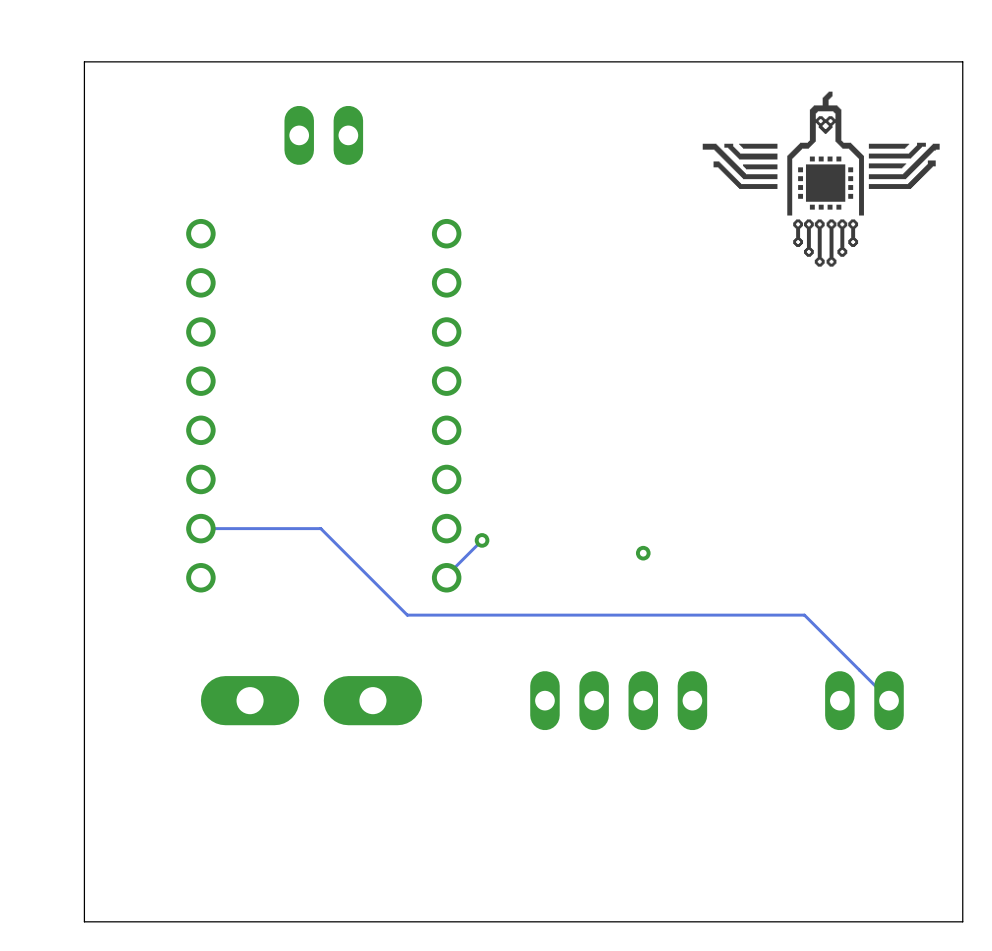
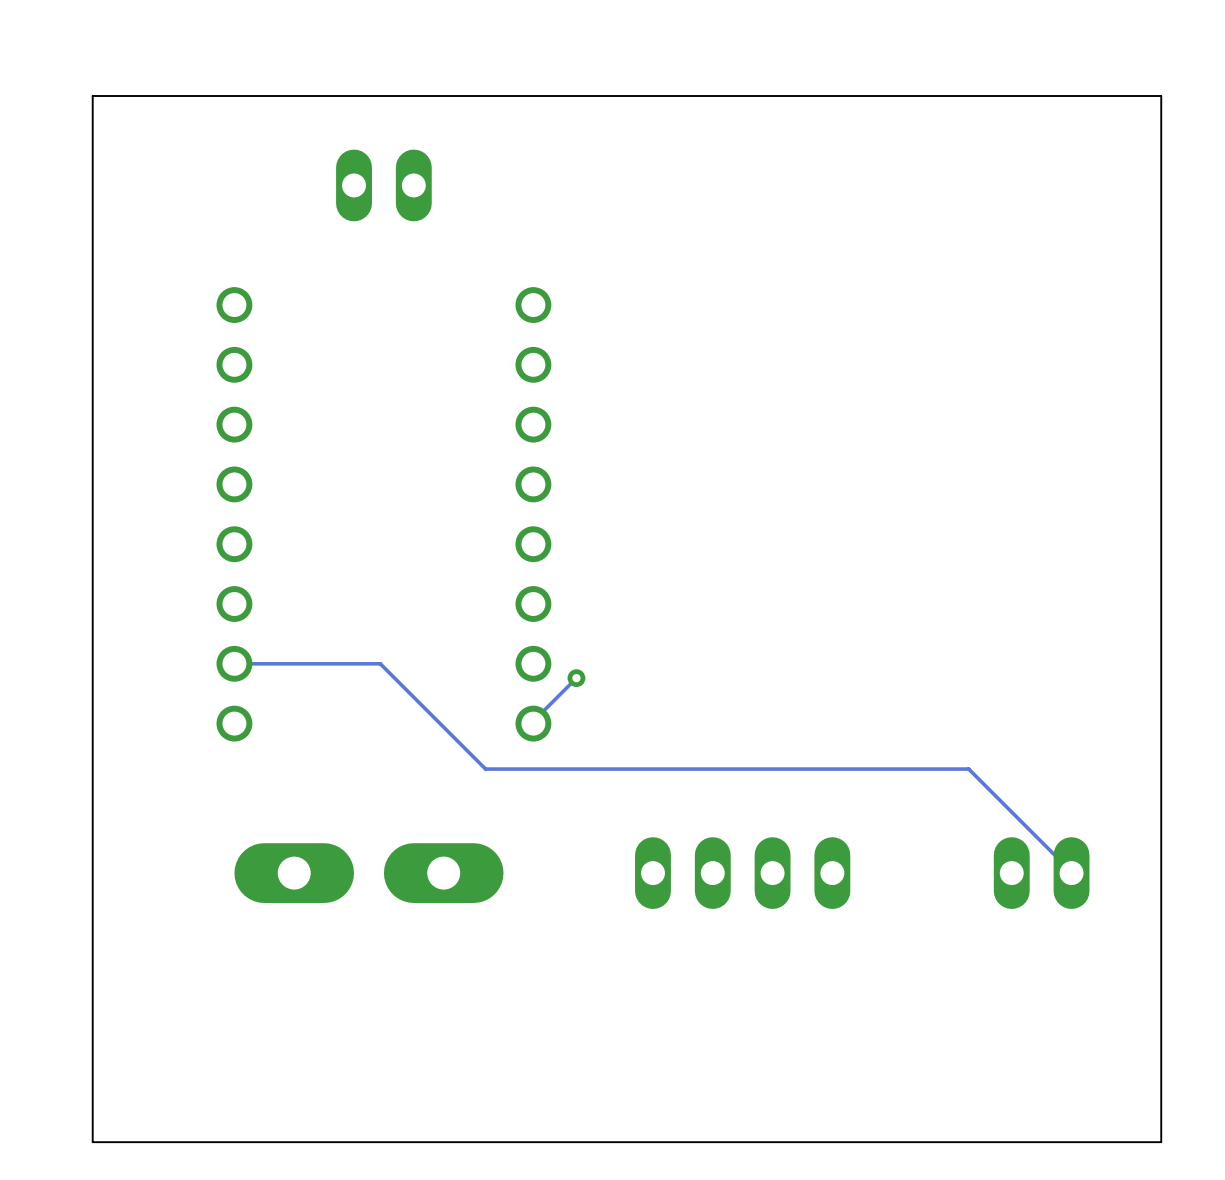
drawing: [702, 91, 940, 267] -> none
via: (643, 553) -> none

